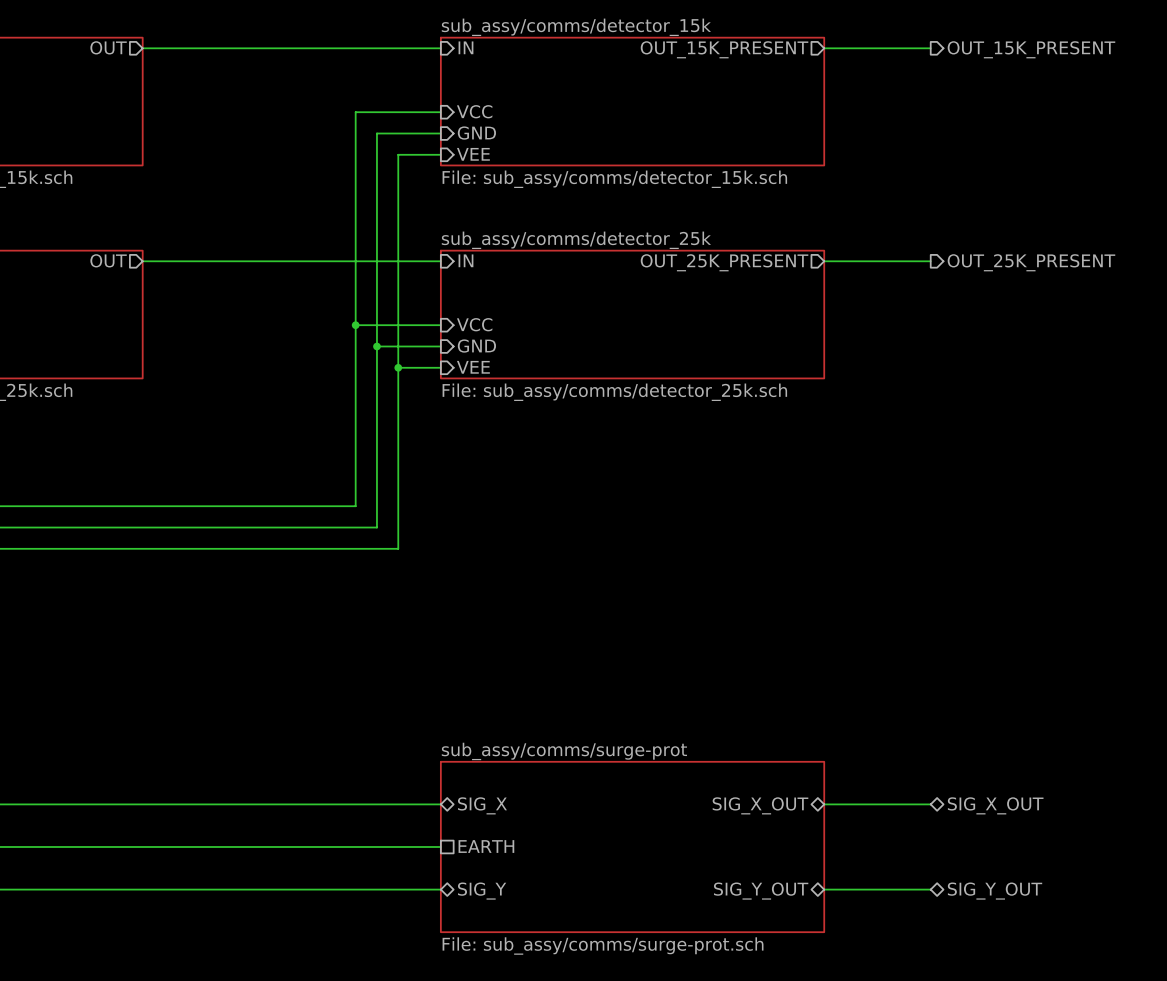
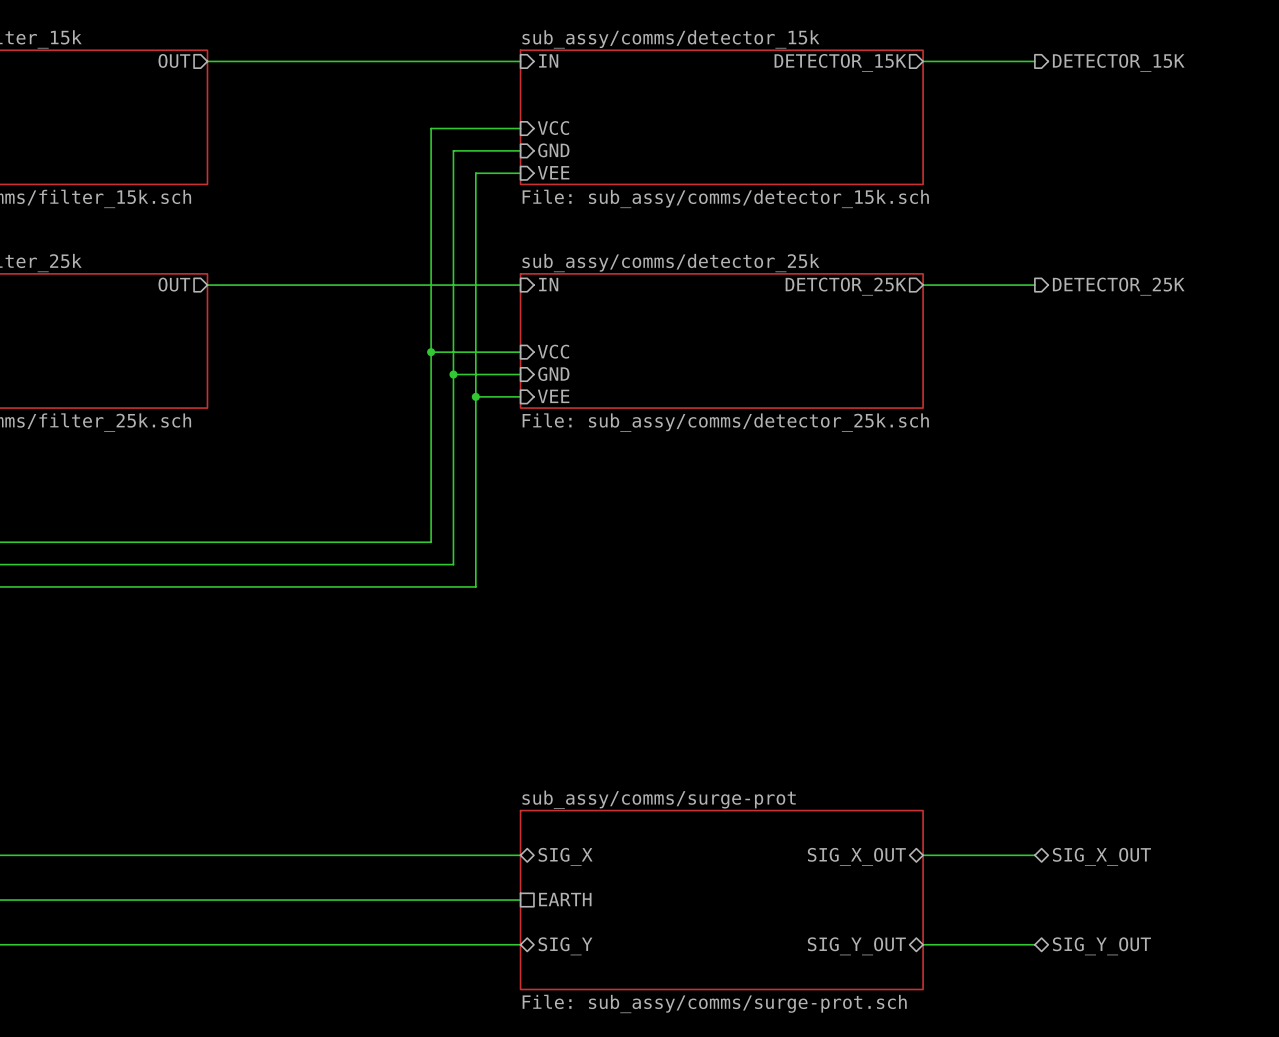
sheet pin: OUT_15K_PRESENT (724, 49) -> DETECTOR_15K (840, 62)
hierarchical label: OUT_15K_PRESENT (1031, 49) -> DETECTOR_15K (1118, 62)
sheet pin: OUT_25K_PRESENT (724, 262) -> DETCTOR_25K (845, 286)
hierarchical label: OUT_25K_PRESENT (1031, 262) -> DETECTOR_25K (1118, 286)

